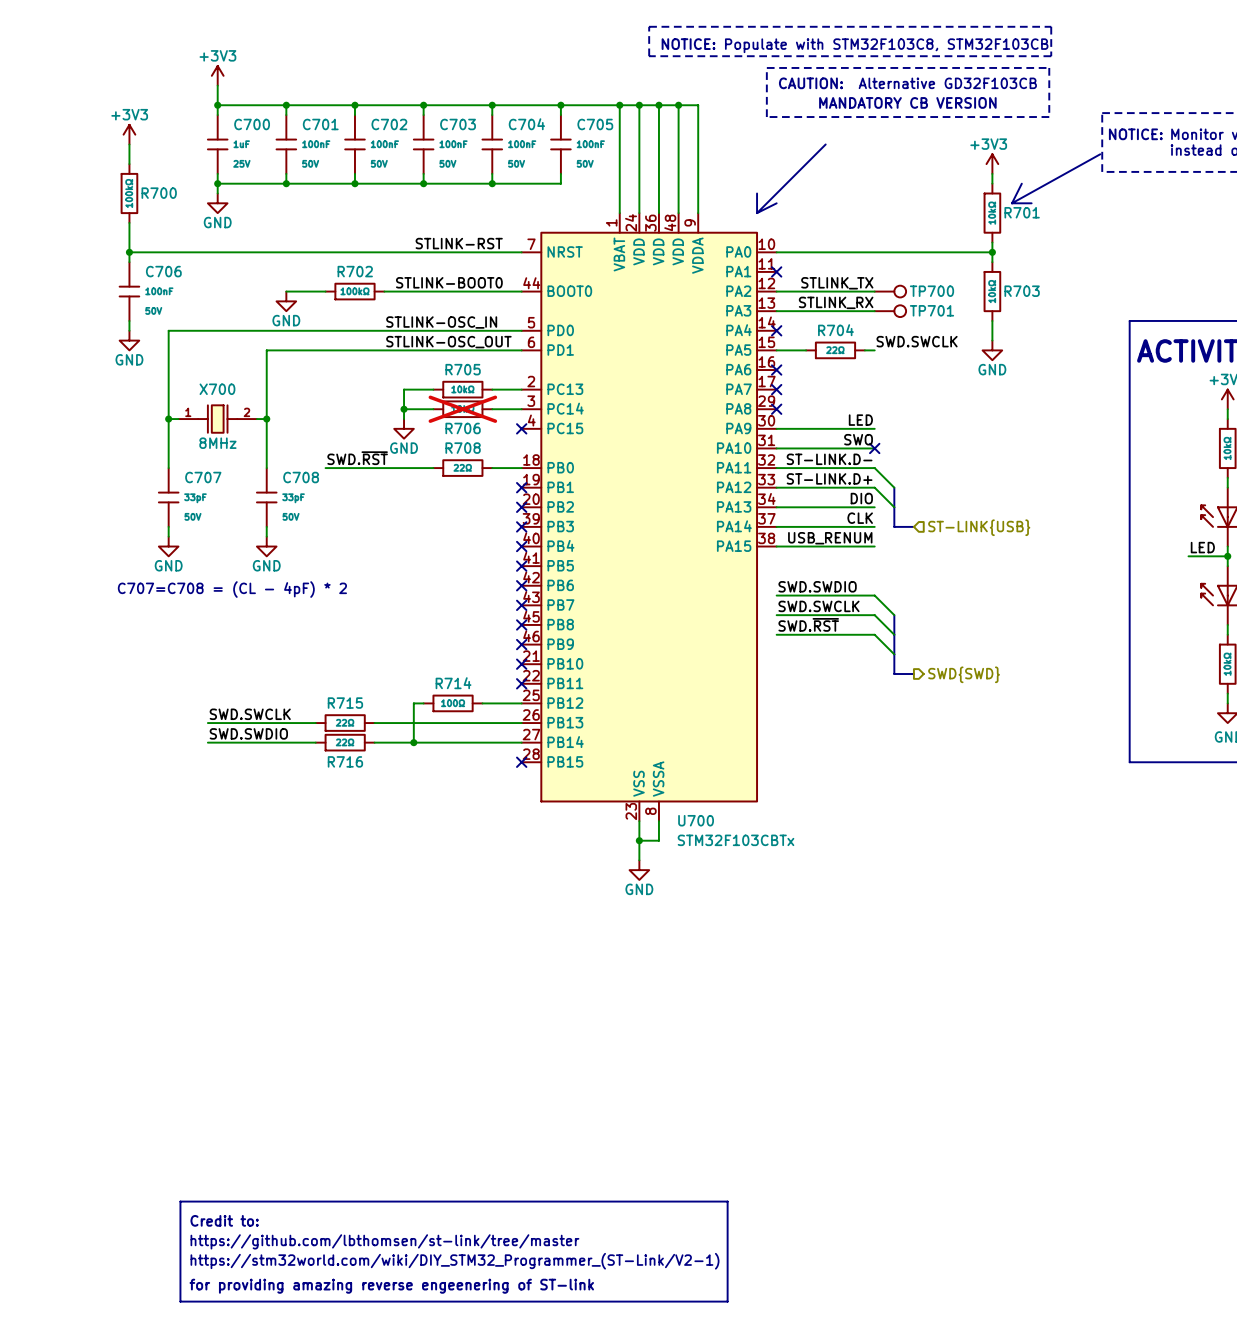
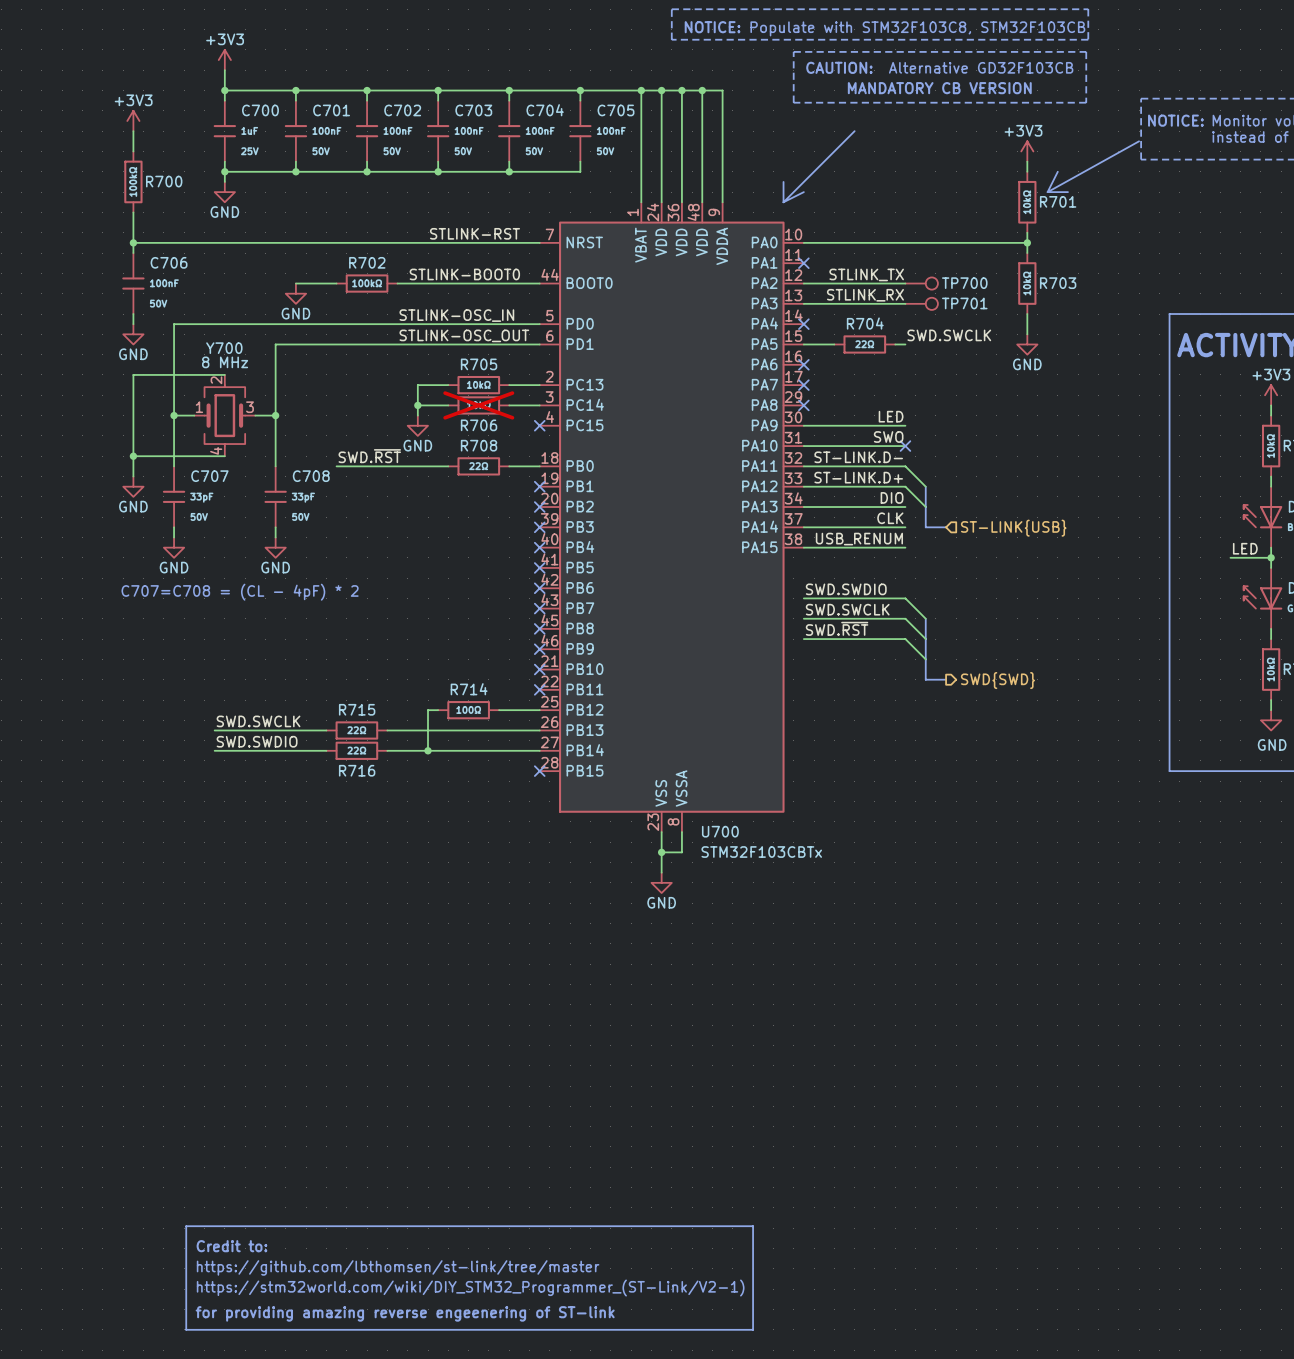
wire: none -> (224, 374) (133, 374) (133, 476)
X700: (217, 419) -> none
Y700: none -> 8 MHz (224, 415)
wire: none -> (133, 456) (224, 456)
junction: none -> (133, 456)
power symbol: none -> GND (133, 486)

